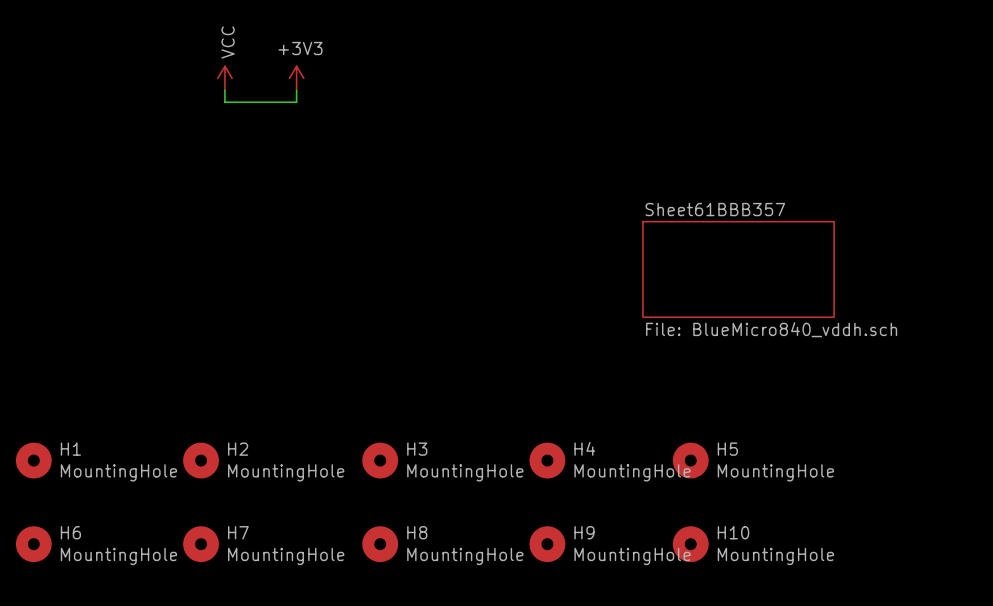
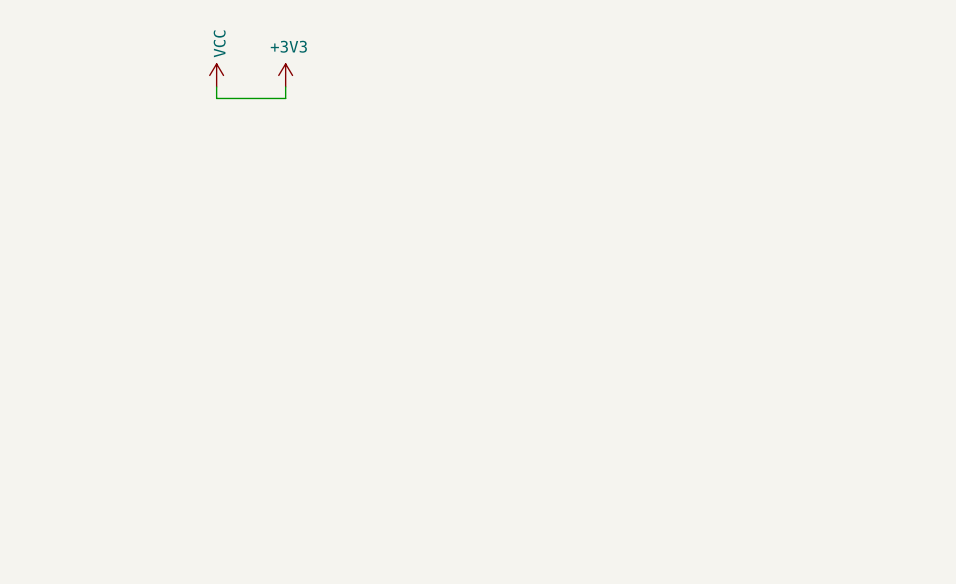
sheet Sheet61BBB357: File: BlueMicro840_vddh.sch (738, 269) -> none
H1: MountingHole (33, 460) -> none
H2: MountingHole (201, 460) -> none
H3: MountingHole (380, 460) -> none
H4: MountingHole (547, 460) -> none
H5: MountingHole (690, 460) -> none
H6: MountingHole (33, 544) -> none
H7: MountingHole (201, 544) -> none
H8: MountingHole (380, 544) -> none
H9: MountingHole (547, 544) -> none
H10: MountingHole (690, 544) -> none

